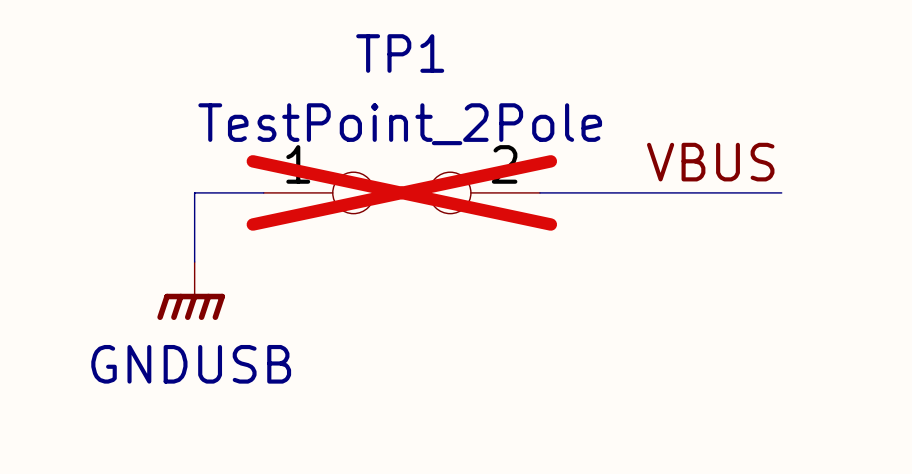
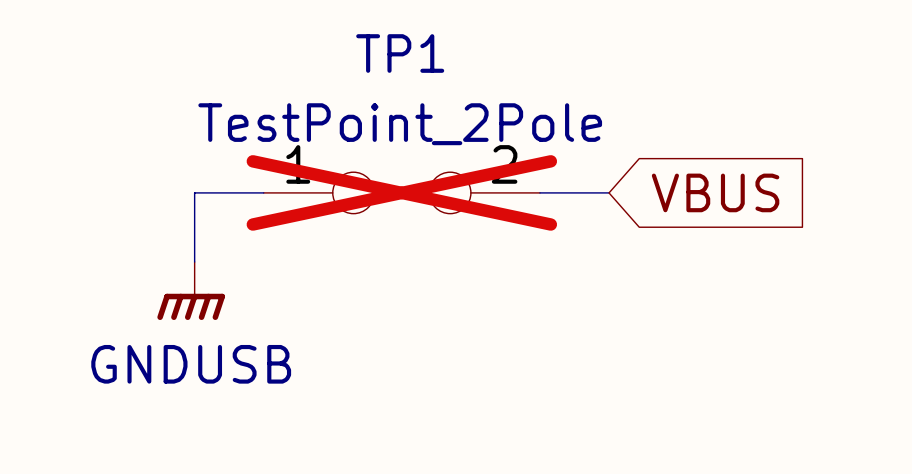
label: VBUS (710, 162) -> none
wire: (609, 192) (781, 192) -> none
global label: none -> VBUS (715, 192)

